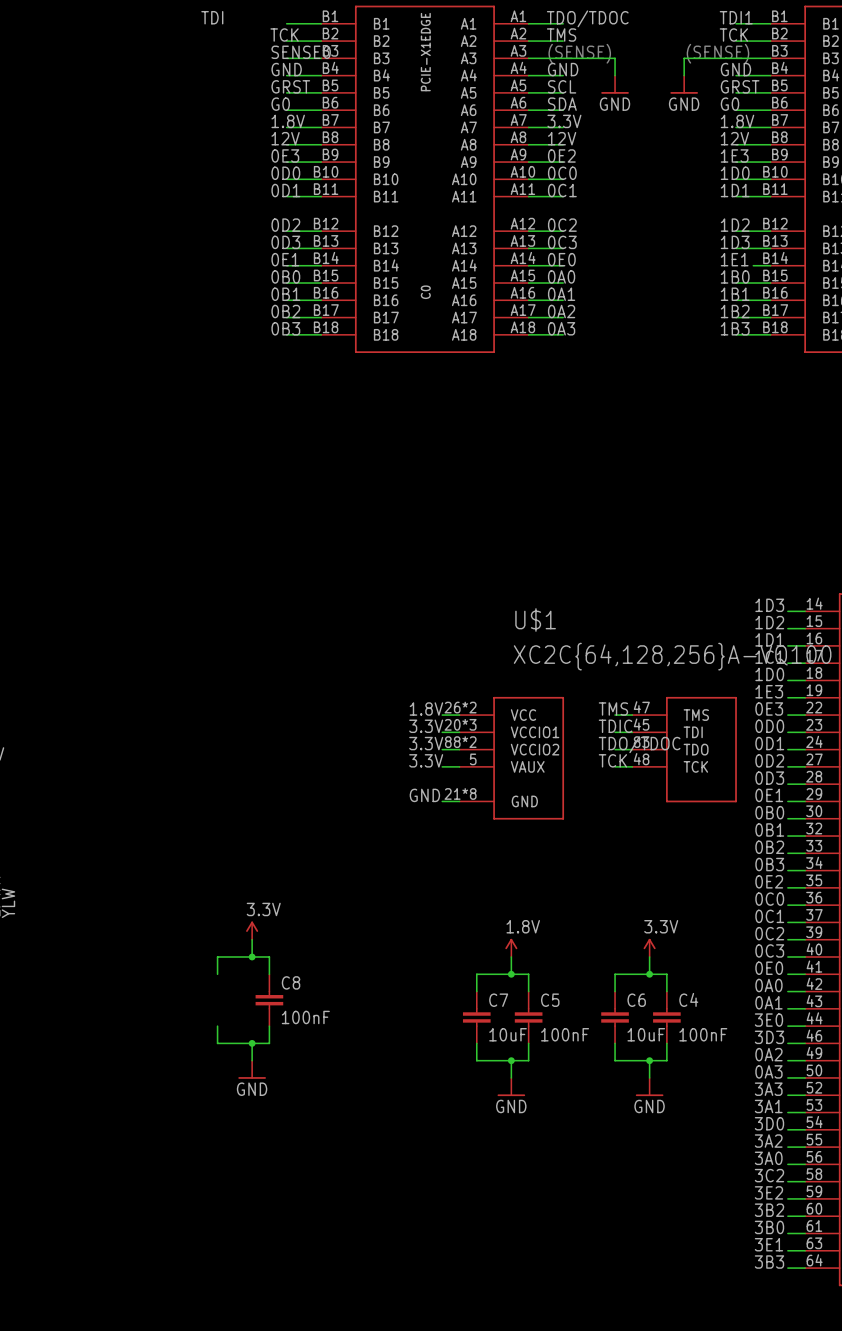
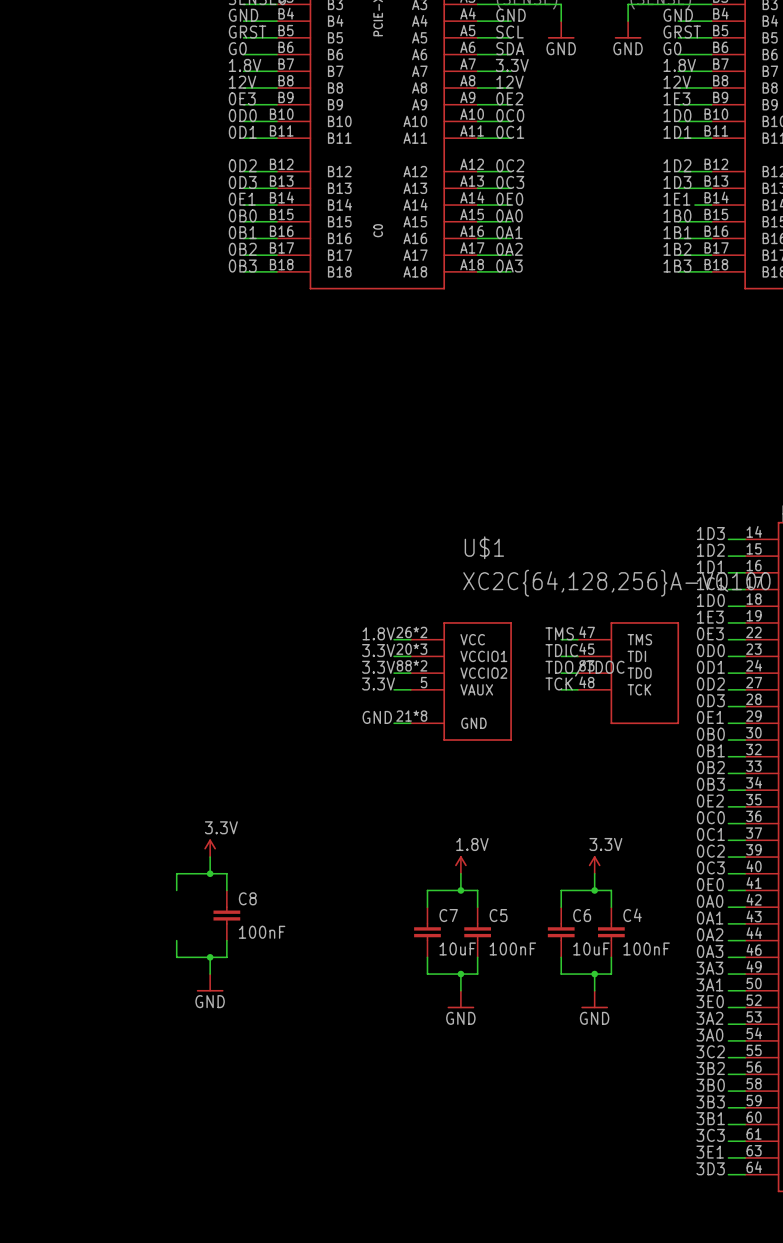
label: 3E0 (768, 1020) -> 0A2 (710, 934)
label: 3D3 (769, 1037) -> 0A3 (710, 951)
label: 0A2 (768, 1054) -> 3A3 (709, 968)
label: 0A3 (768, 1071) -> 3A1 (709, 984)
label: 3A3 (768, 1089) -> 3E0 (710, 1001)
label: 3A1 (768, 1106) -> 3A2 (709, 1018)
label: 3D0 (769, 1123) -> 3A0 (709, 1035)
label: 3A2 (768, 1141) -> 3C2 (710, 1051)
label: 3A0 (768, 1158) -> 3B2 (710, 1068)
label: 3C2 (769, 1175) -> 3B0 (710, 1085)
label: 3E2 (768, 1192) -> 3B3 (710, 1101)
label: 3B2 (769, 1210) -> 3B1 (710, 1118)
label: 3B0 (769, 1227) -> 3C3 (710, 1135)
label: 3B3 (769, 1262) -> 3D3 (710, 1168)

